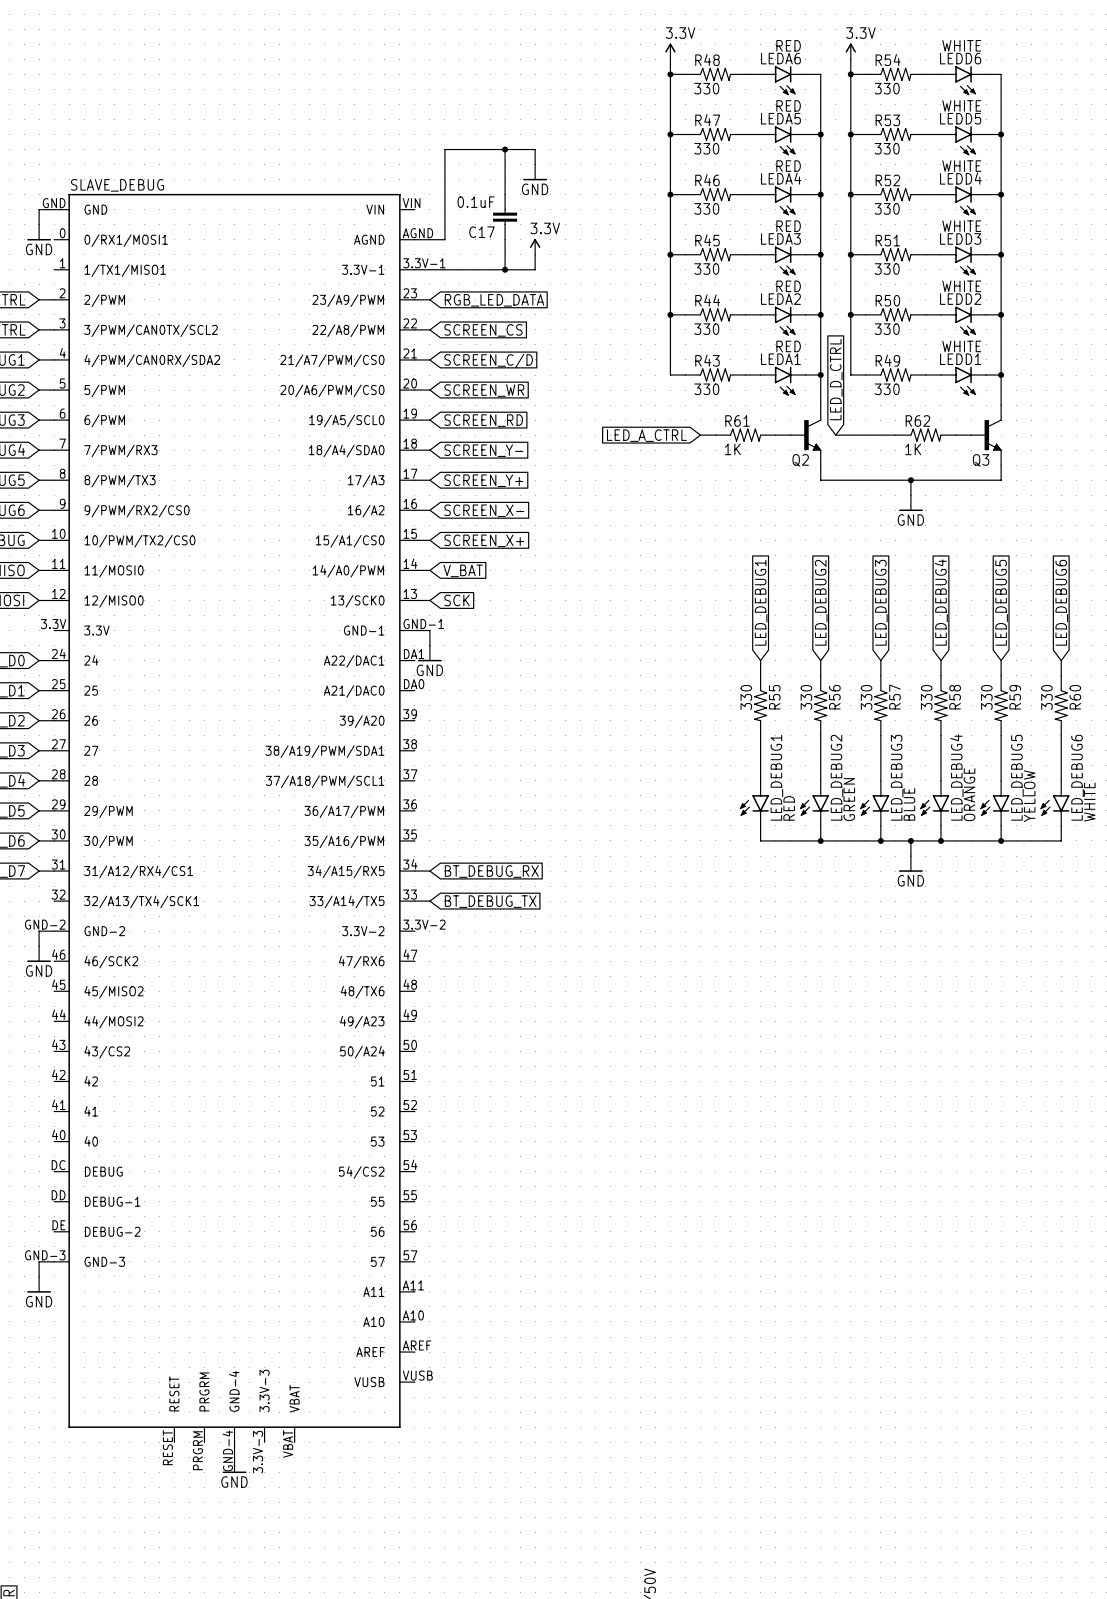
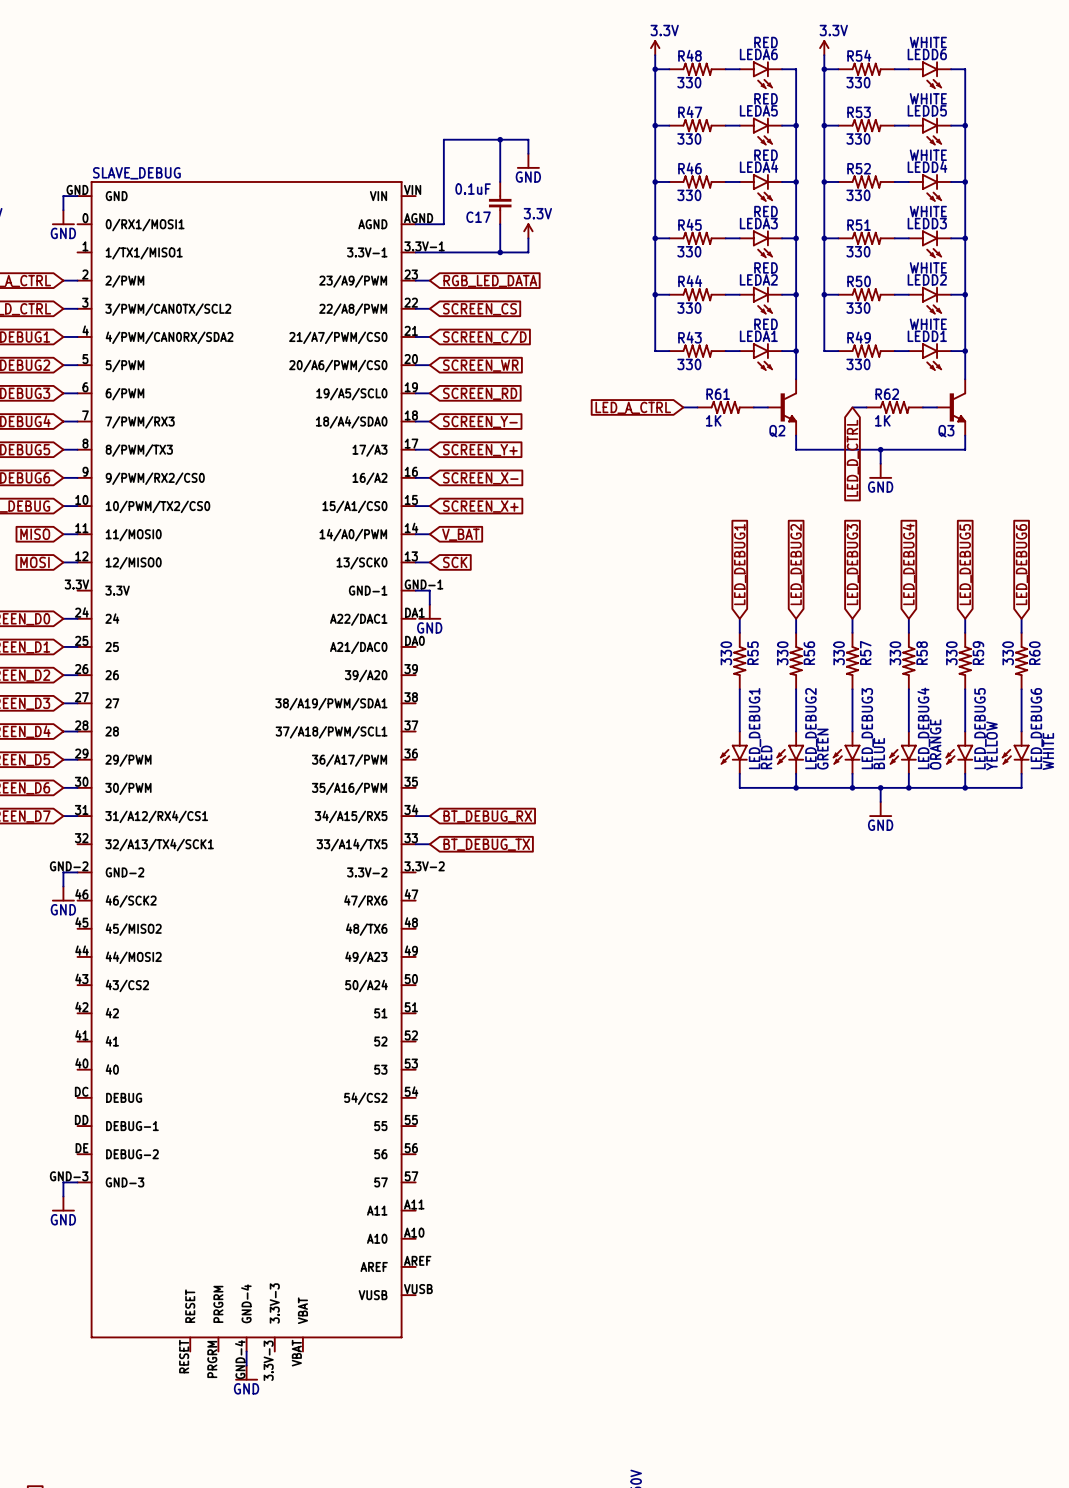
global label rotation: 0° (836, 379) -> 180° (852, 458)
global label position: LED_D_CTRL (836, 379) -> LED_D_CTRL (852, 458)
wire: (835, 435) (880, 435) -> none

